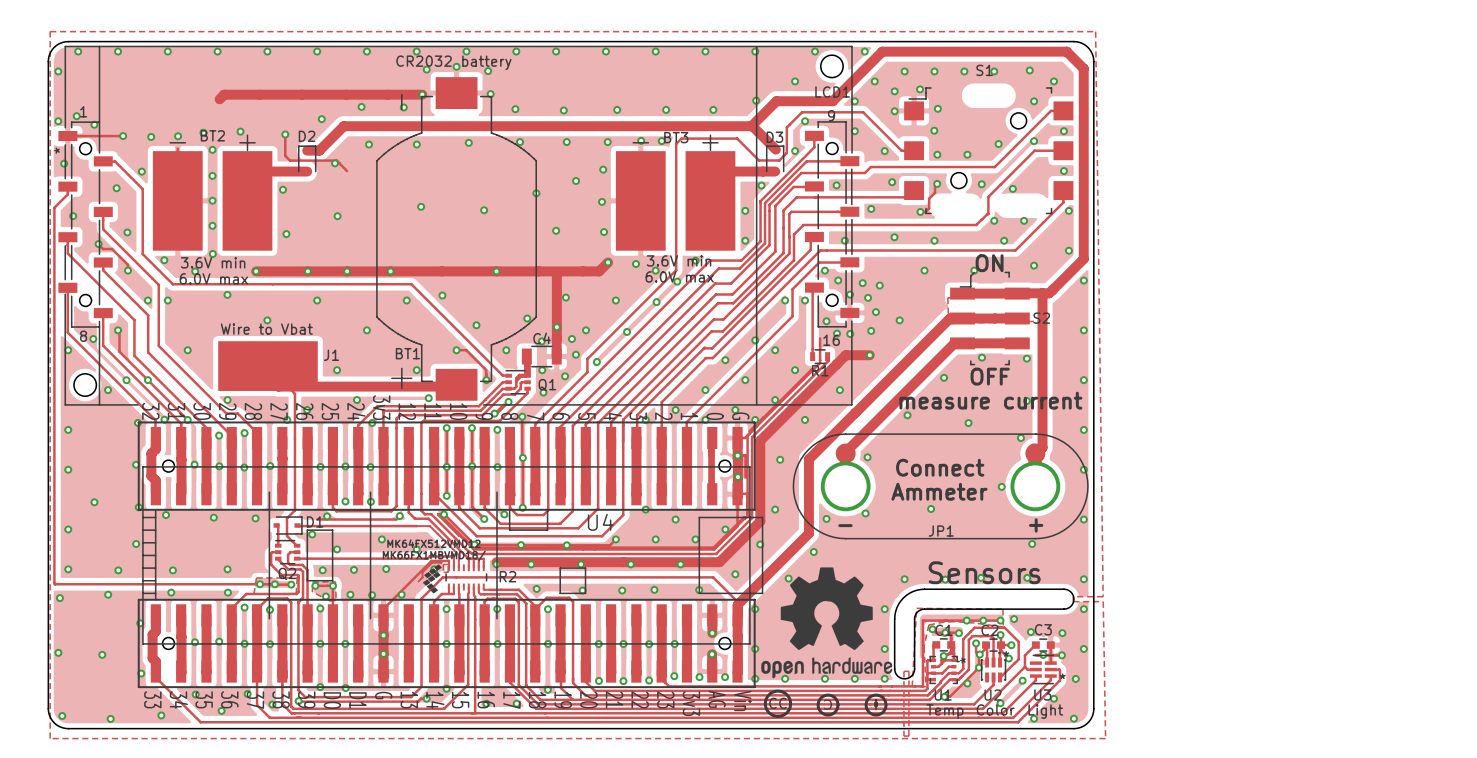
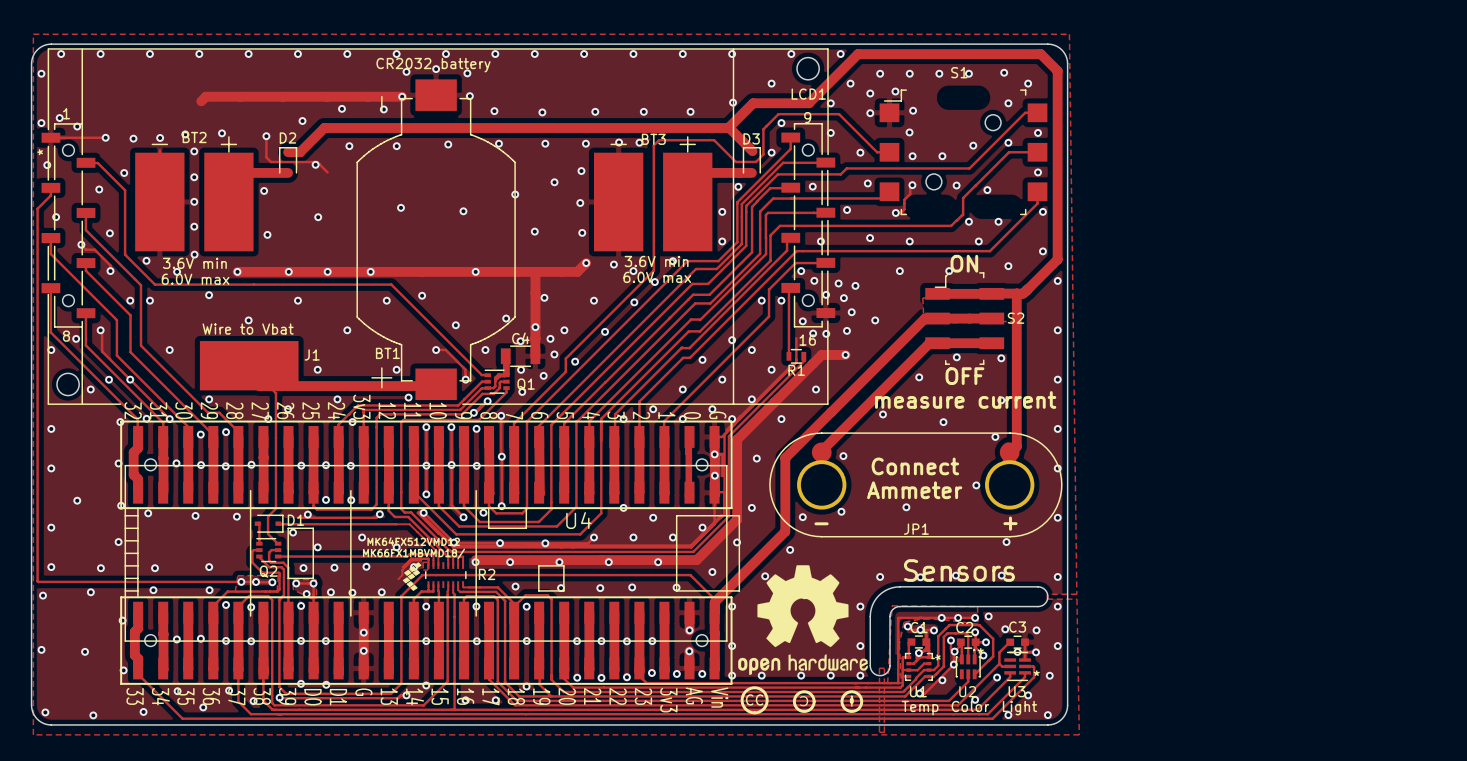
track: (423, 569) (383, 608) -> none

